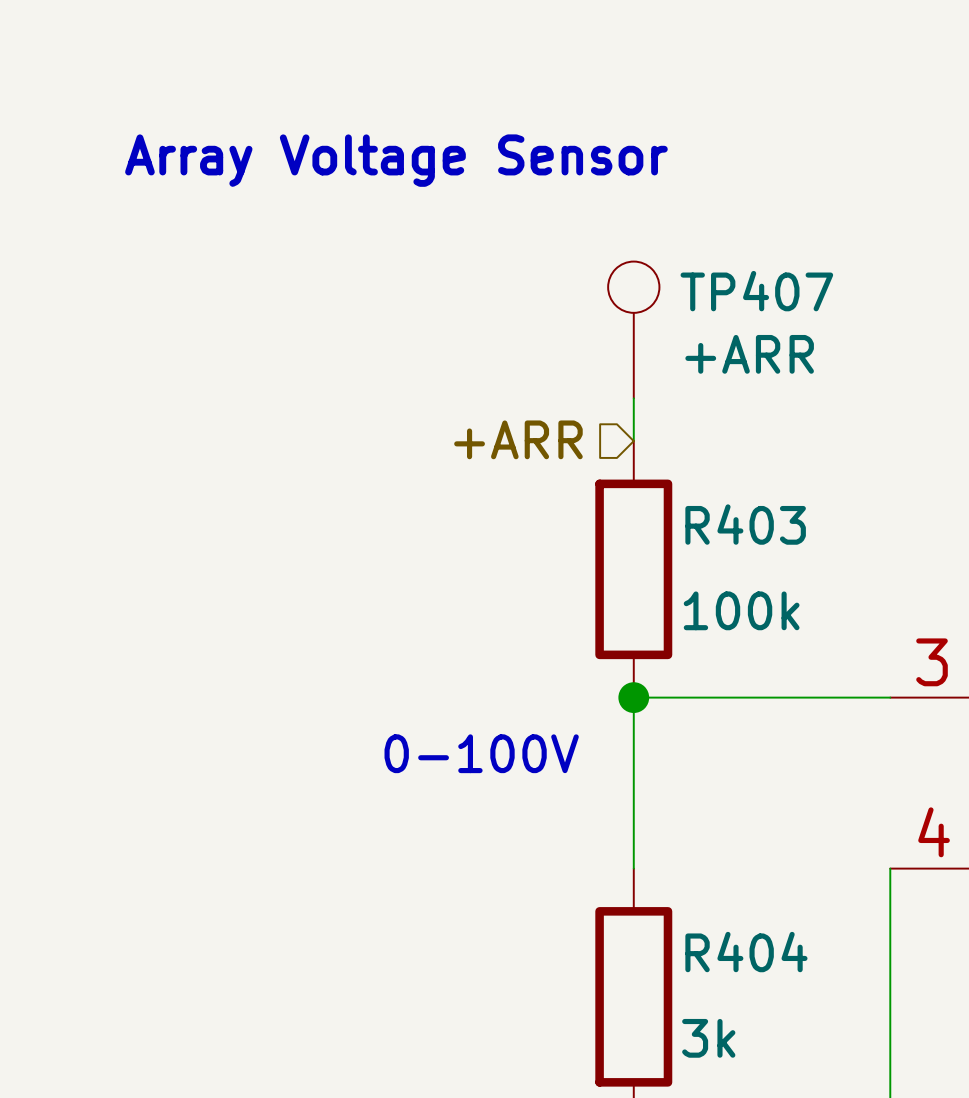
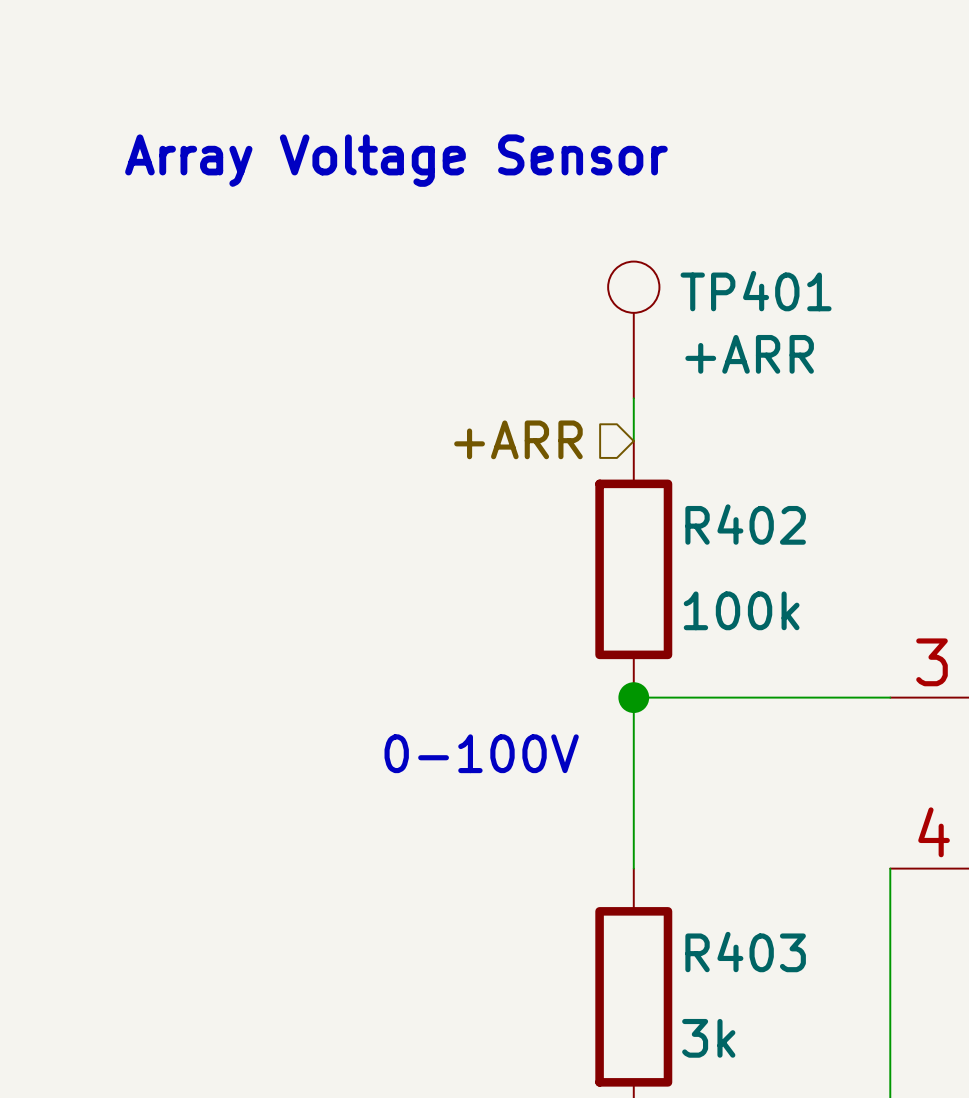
TP407 name: TP407 (756, 291) -> TP401 (756, 291)
R403 name: R403 (745, 524) -> R402 (745, 524)
R404 name: R404 (746, 952) -> R403 (745, 952)

